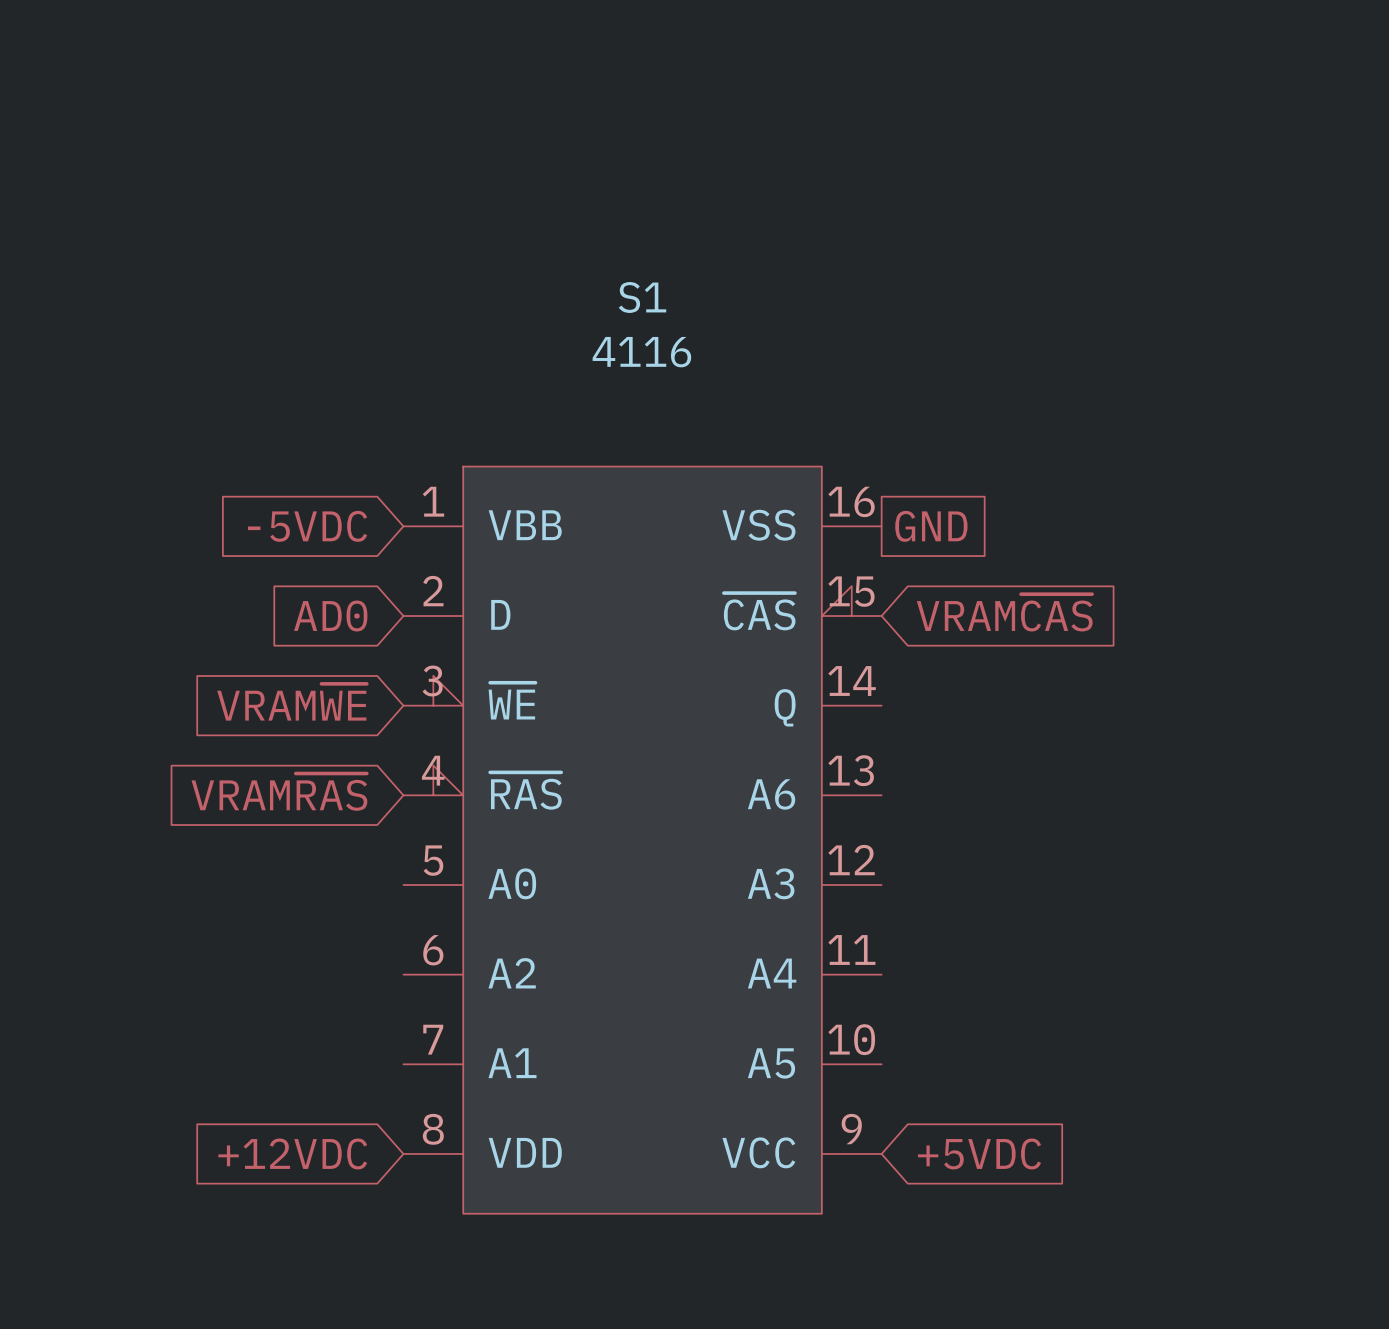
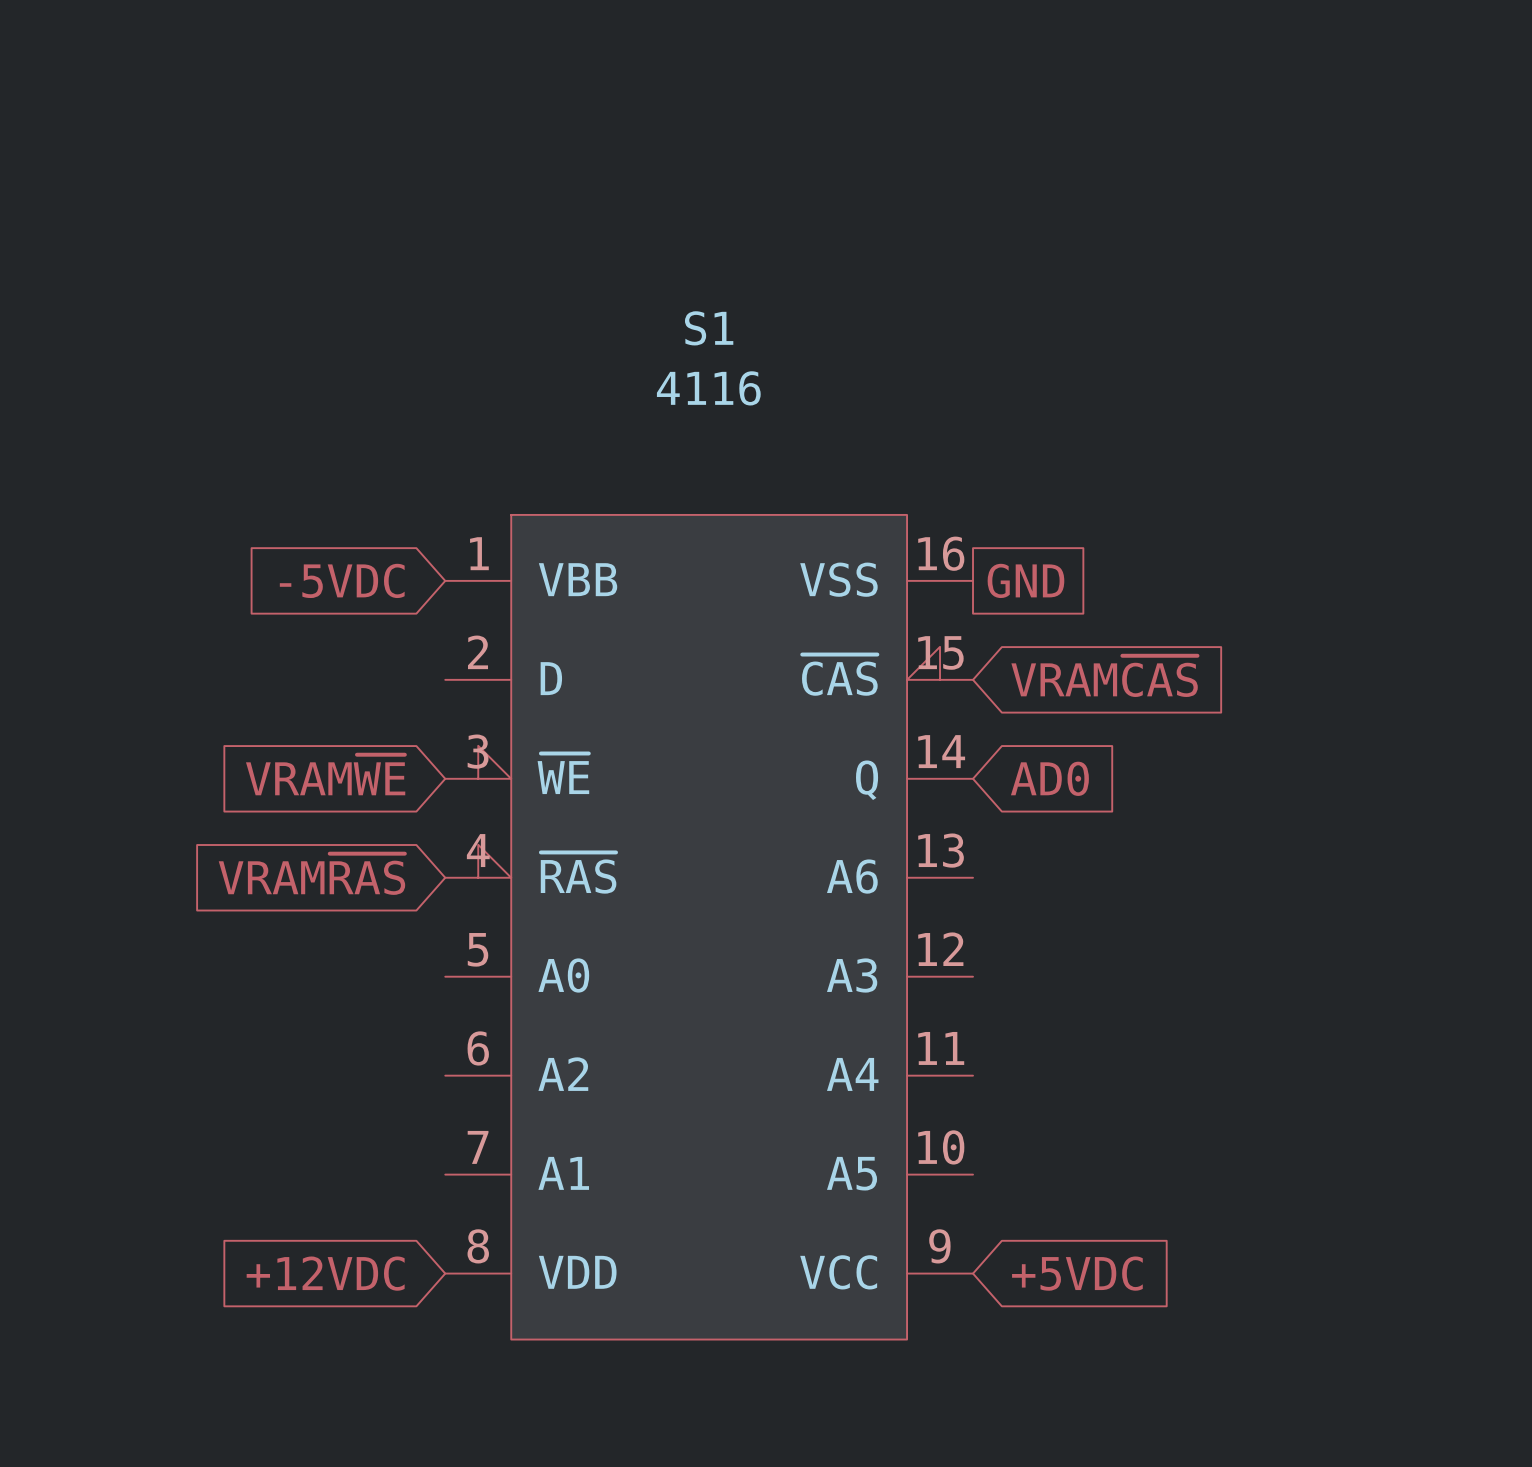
global label rotation: 0° (330, 616) -> 180° (1049, 778)
global label position: AD0 (330, 616) -> AD0 (1049, 778)

